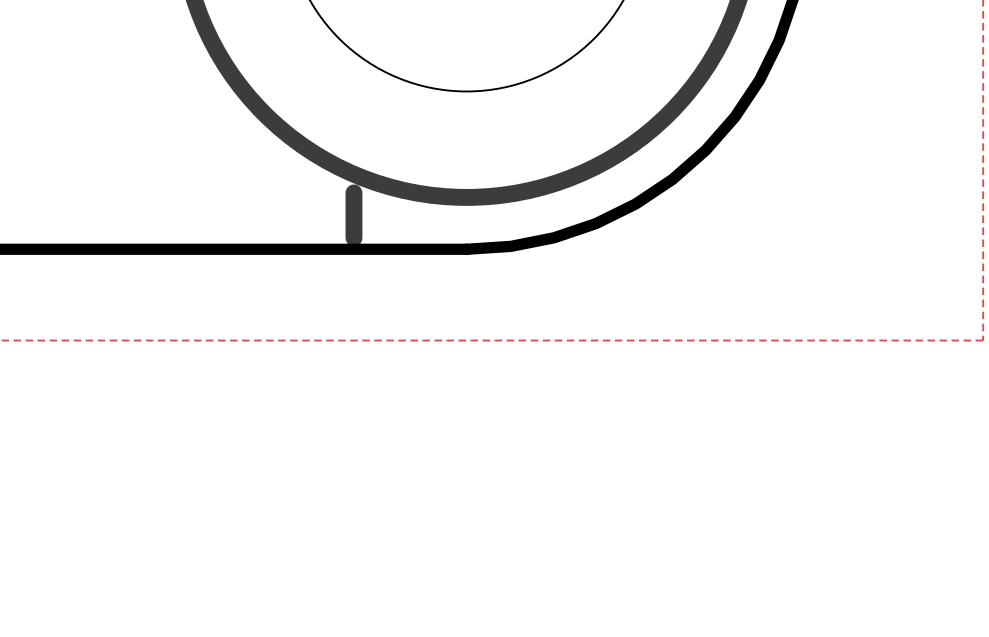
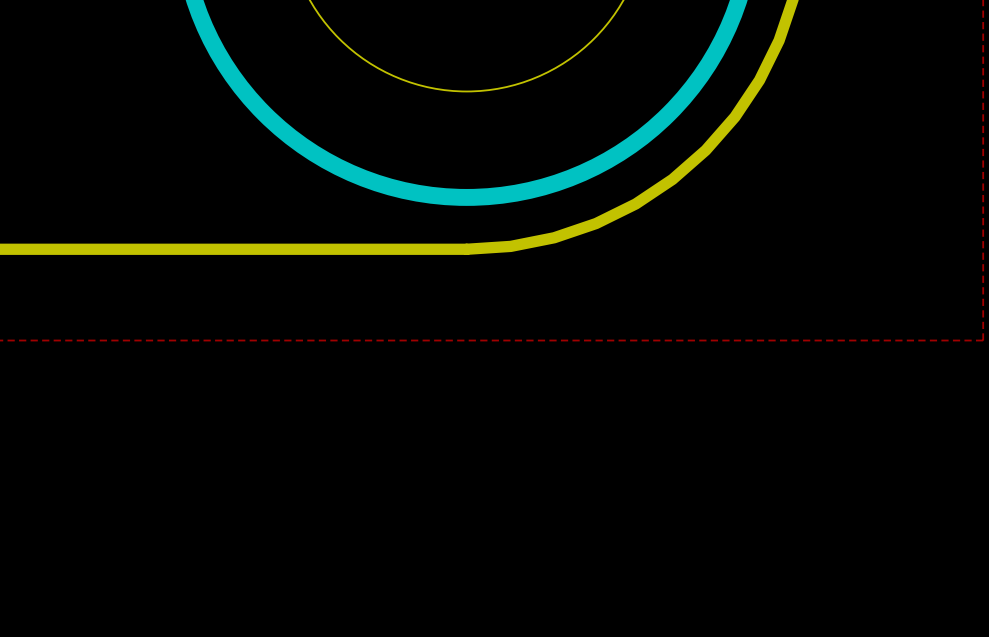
line: (353, 192) (353, 238) -> none

